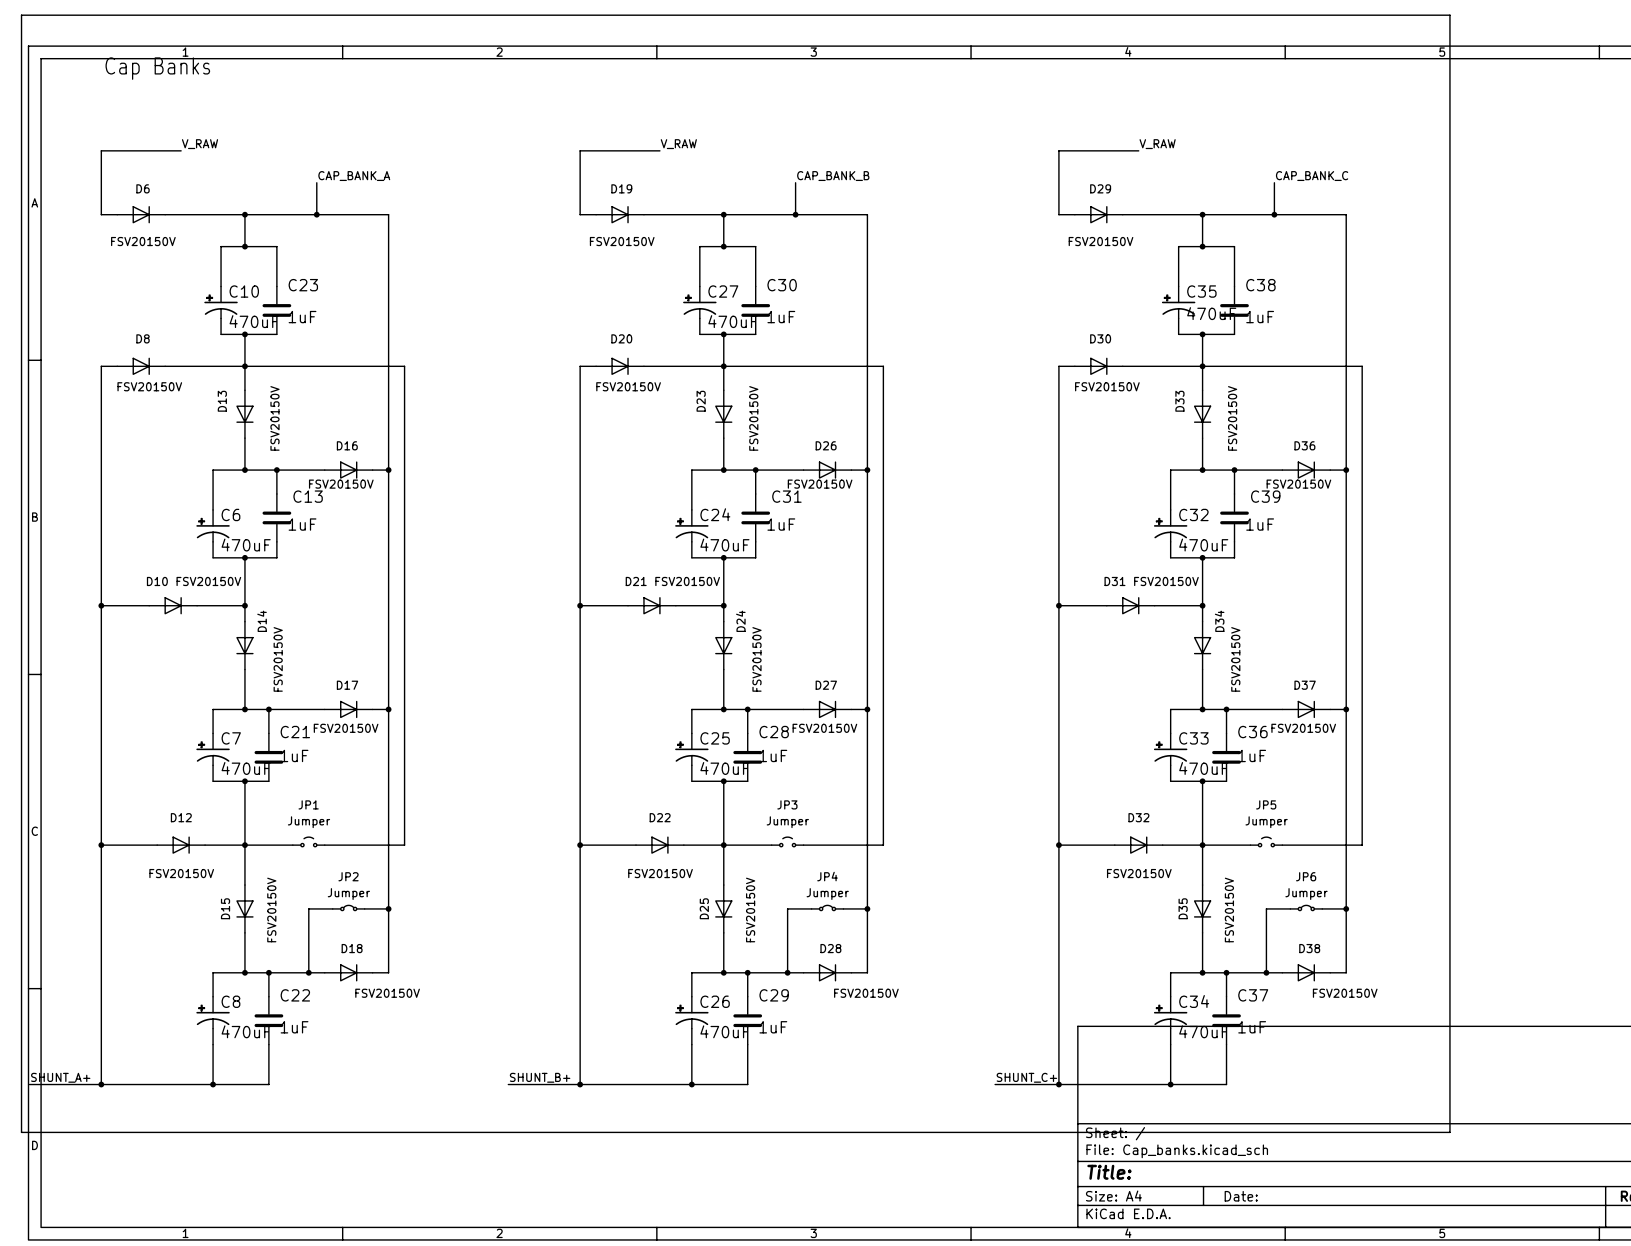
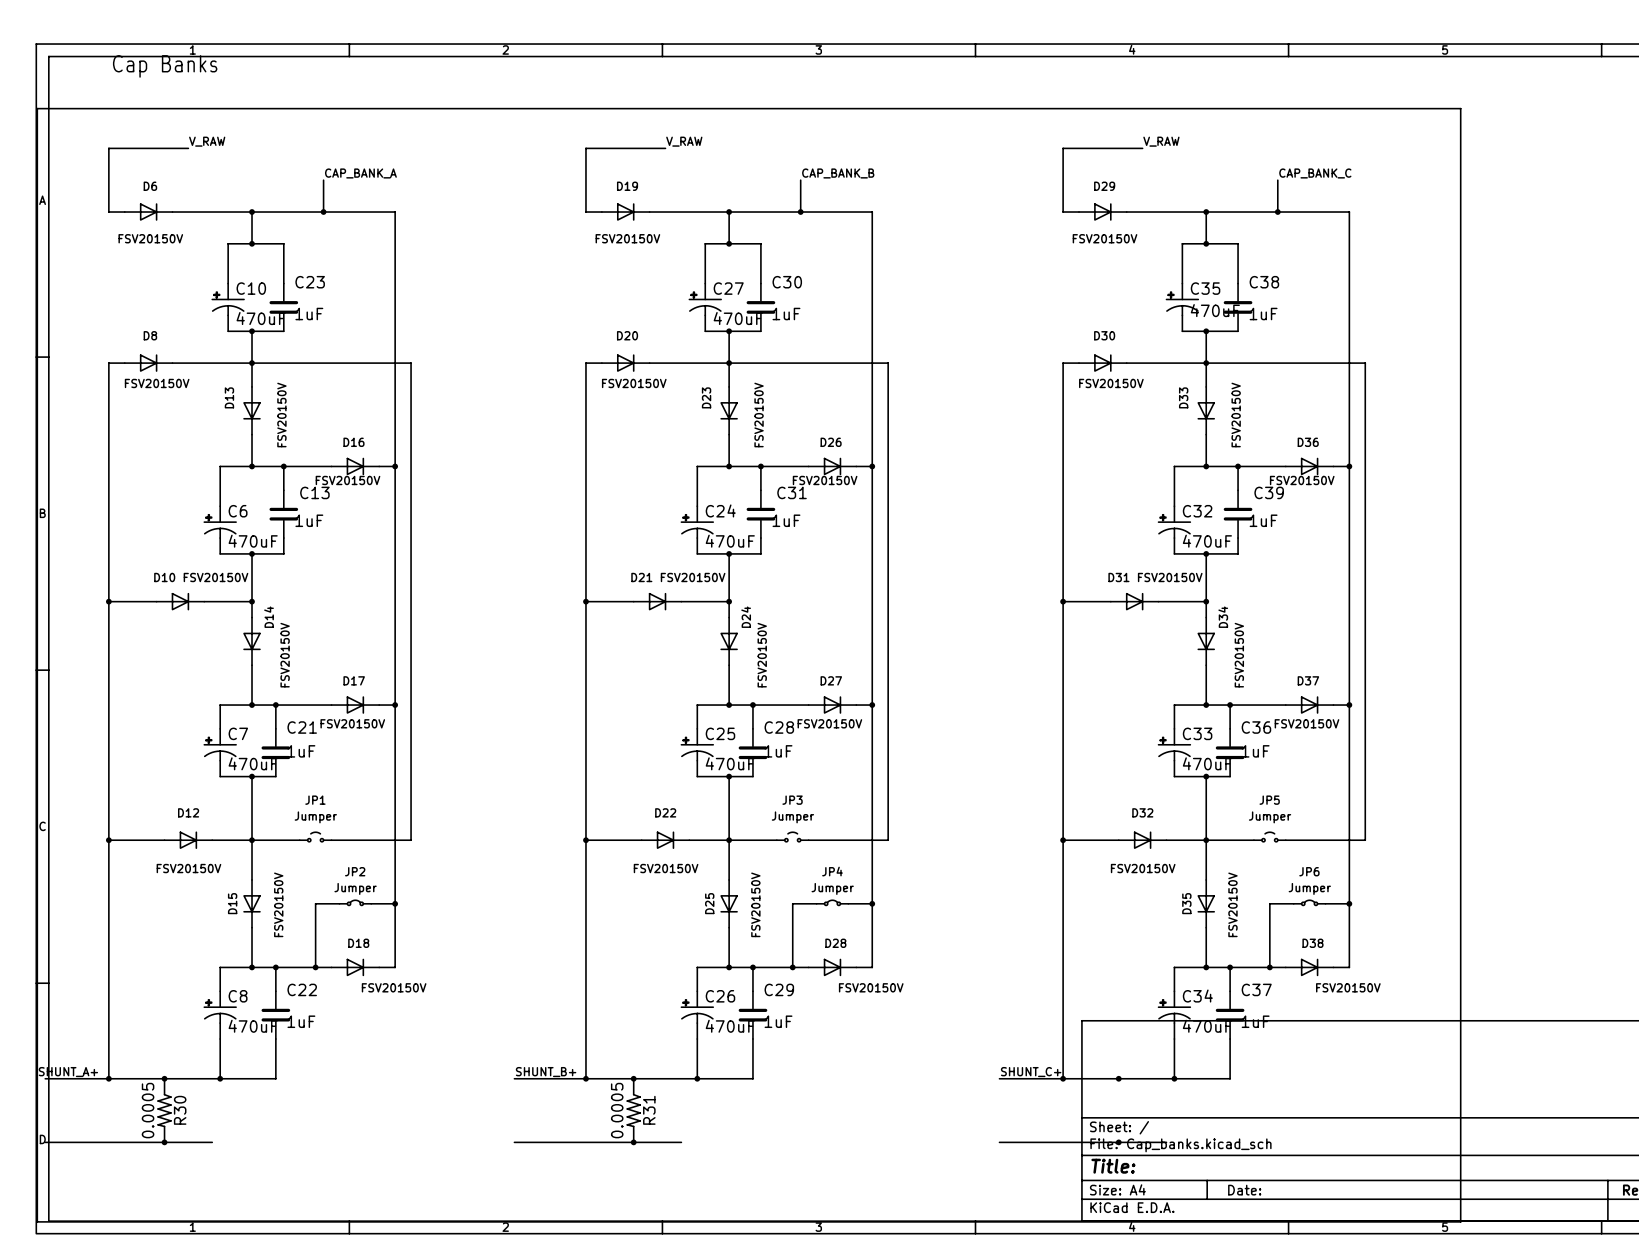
line: (21, 15) (1449, 15) (1449, 1132) (21, 1132) (21, 15) -> (37, 108) (1460, 108) (1460, 1221) (37, 1221) (37, 108)
wire: (29, 1084) (37, 1084) -> none
junction: none -> (164, 1078)
junction: none -> (633, 1078)
junction: none -> (1118, 1078)
R30: none -> 0.0005 (164, 1110)
R31: none -> 0.0005 (633, 1110)
wire: none -> (45, 1142) (212, 1142)
junction: none -> (164, 1142)
wire: none -> (514, 1142) (681, 1142)
junction: none -> (633, 1142)
wire: none -> (999, 1142) (1166, 1142)
junction: none -> (1118, 1142)

